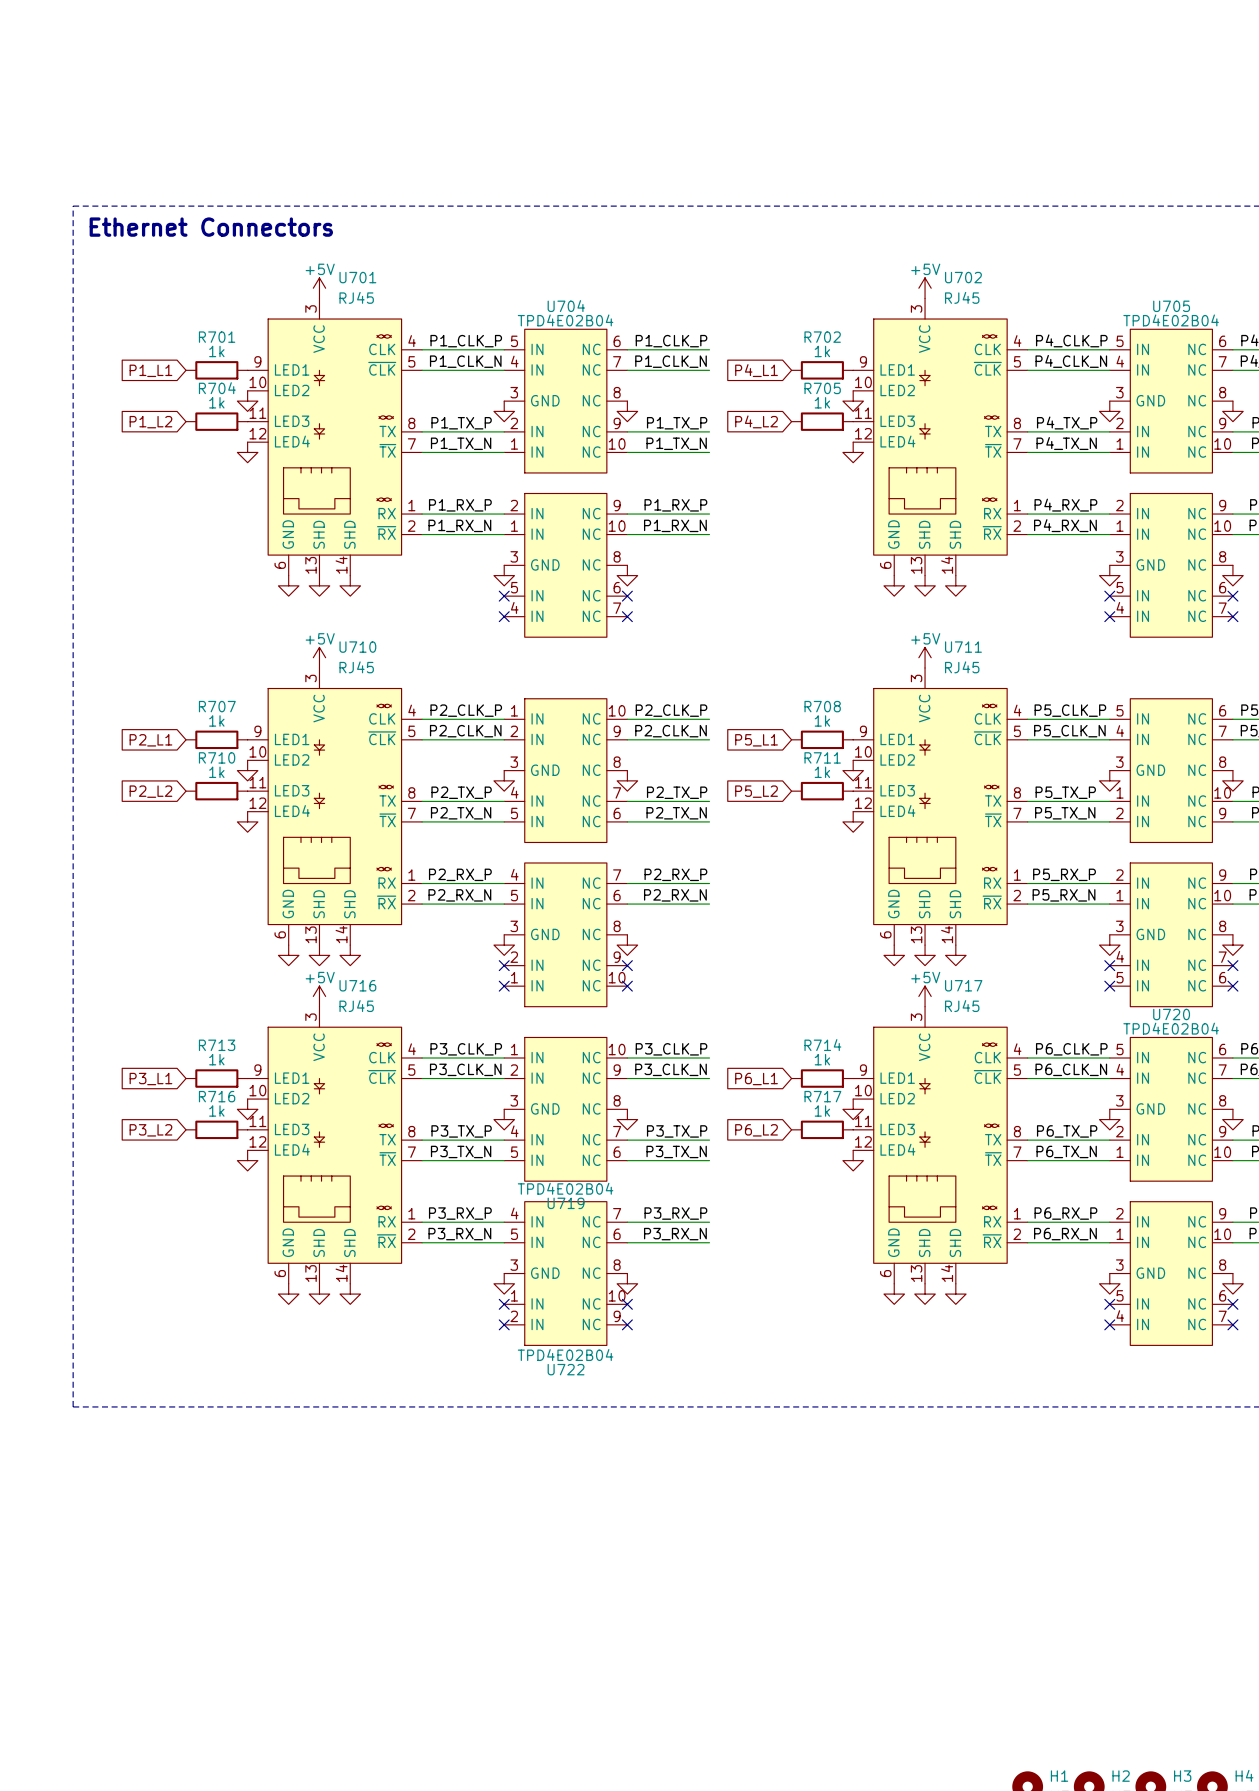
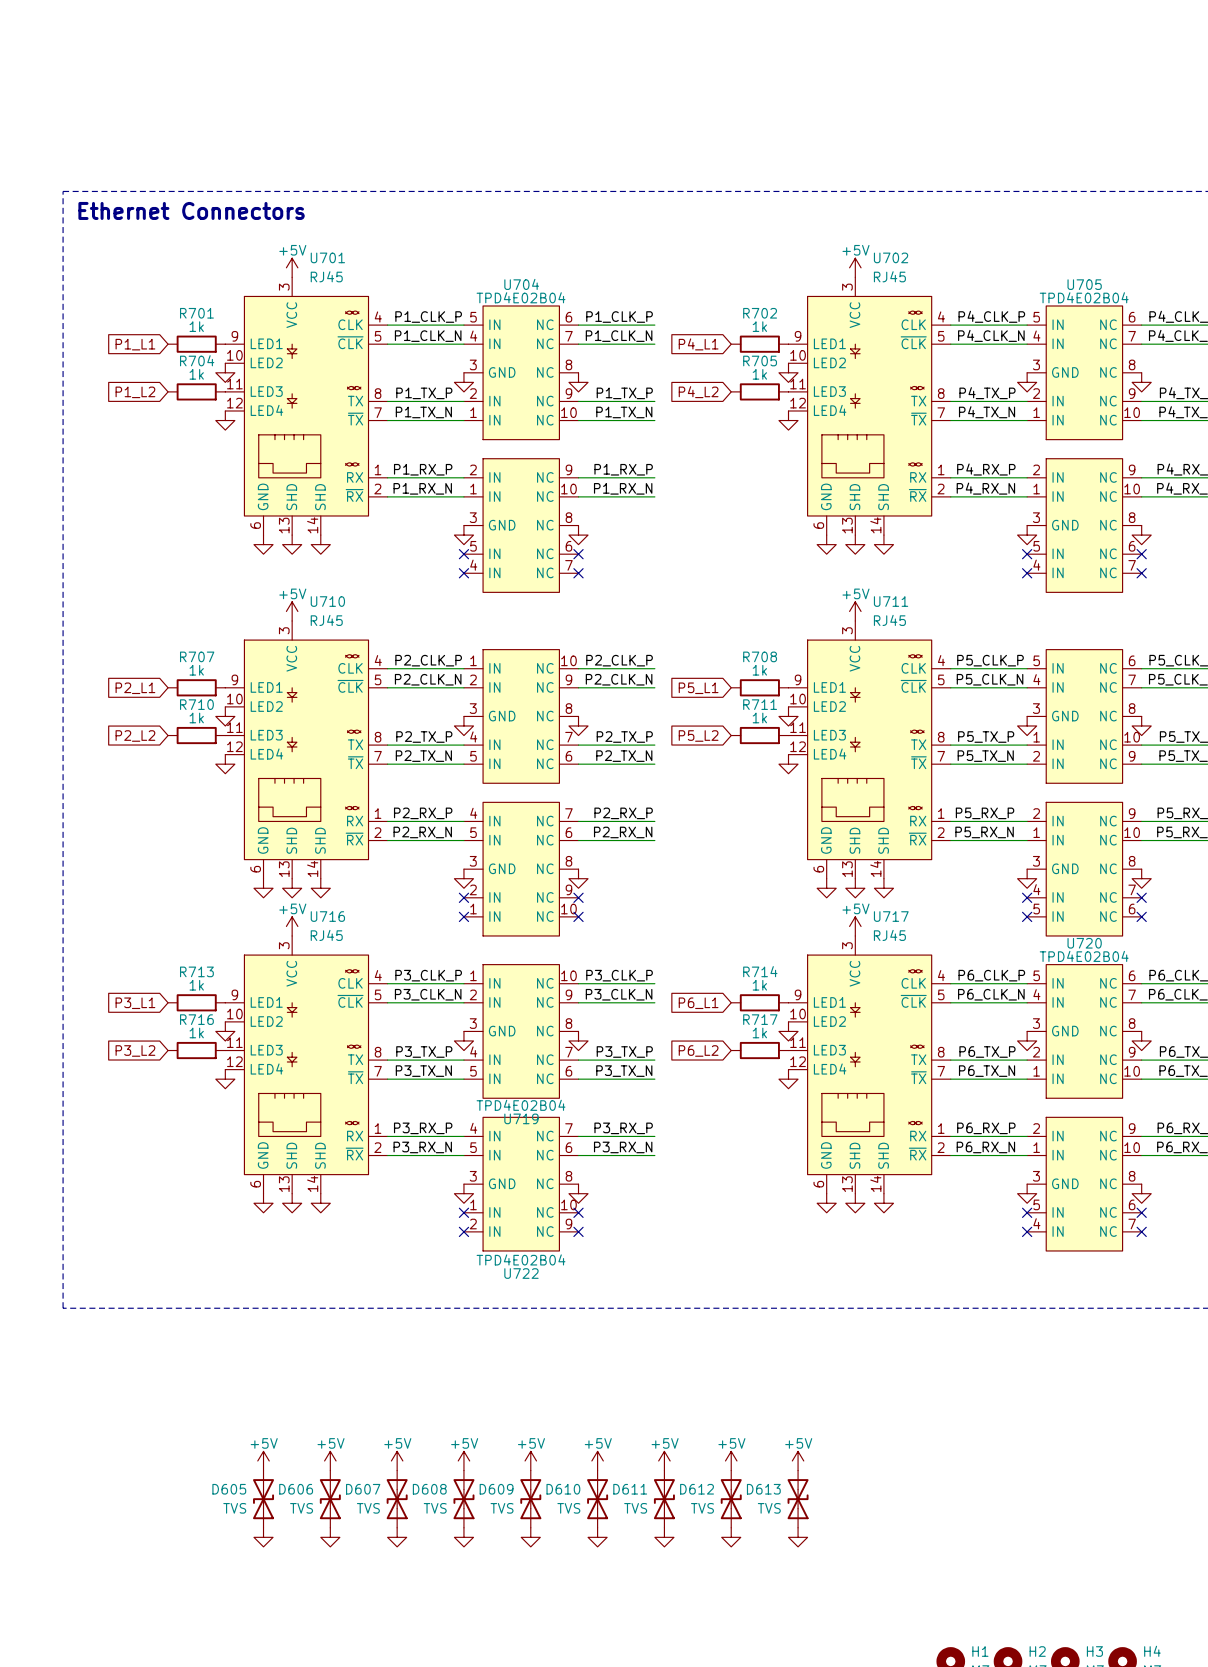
power symbol: none -> +5V (263, 1460)
power symbol: none -> +5V (330, 1460)
power symbol: none -> +5V (397, 1460)
power symbol: none -> +5V (463, 1460)
power symbol: none -> +5V (530, 1460)
power symbol: none -> +5V (597, 1460)
power symbol: none -> +5V (664, 1460)
power symbol: none -> +5V (731, 1460)
power symbol: none -> +5V (798, 1460)
D605: none -> TVS (263, 1499)
D606: none -> TVS (330, 1499)
D607: none -> TVS (397, 1499)
D608: none -> TVS (463, 1499)
D609: none -> TVS (530, 1499)
D610: none -> TVS (597, 1499)
D611: none -> TVS (664, 1499)
D612: none -> TVS (731, 1499)
D613: none -> TVS (798, 1499)
power symbol: none -> (263, 1537)
power symbol: none -> (330, 1537)
power symbol: none -> (397, 1537)
power symbol: none -> (463, 1537)
power symbol: none -> (530, 1537)
power symbol: none -> (597, 1537)
power symbol: none -> (664, 1537)
power symbol: none -> (731, 1537)
power symbol: none -> (798, 1537)

